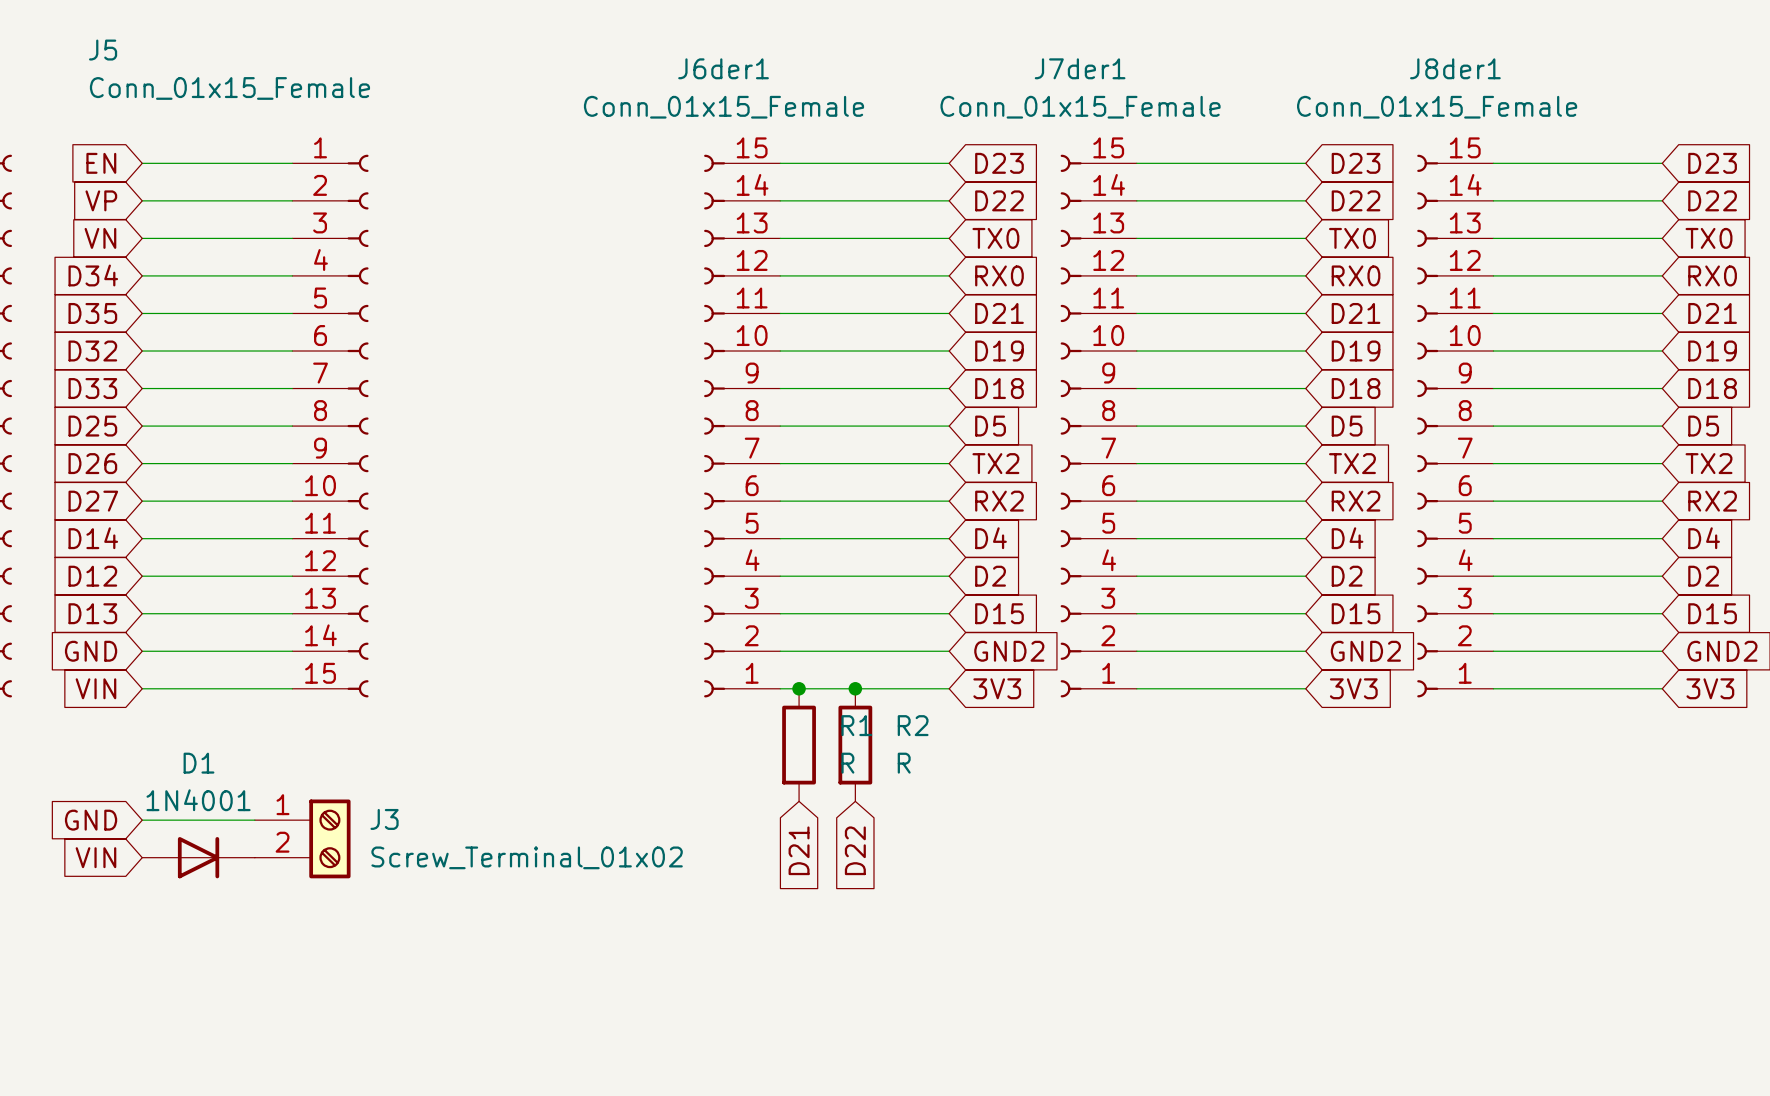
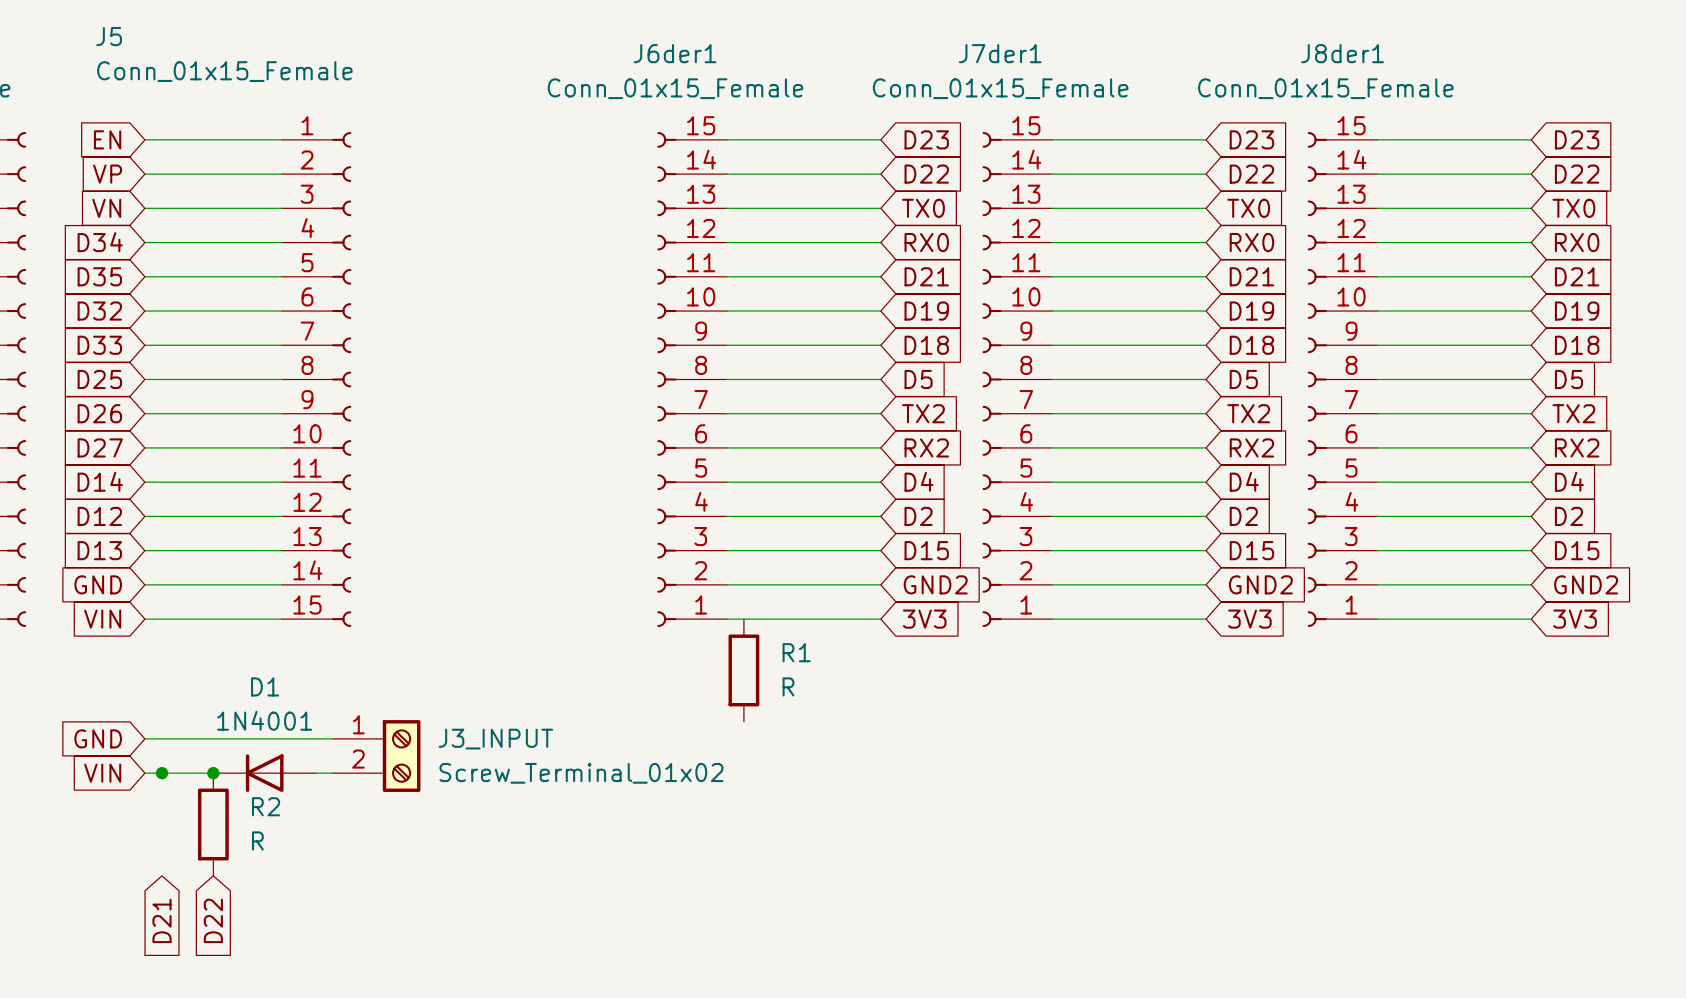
junction: (799, 688) -> none
junction: (855, 688) -> none
R2 position: (855, 745) -> (213, 824)
J3: Screw_Terminal_01x02 (302, 838) -> none
J3_INPUT: none -> Screw_Terminal_01x02 (376, 756)
global label: D21 (799, 850) -> none
global label: D22 (855, 850) -> none
junction: none -> (162, 773)
D1 rotation: 0° (198, 857) -> 180° (264, 773)
D1 position: (198, 857) -> (264, 773)
junction: none -> (213, 773)
global label: none -> D21 (162, 920)
global label: none -> D22 (213, 920)

